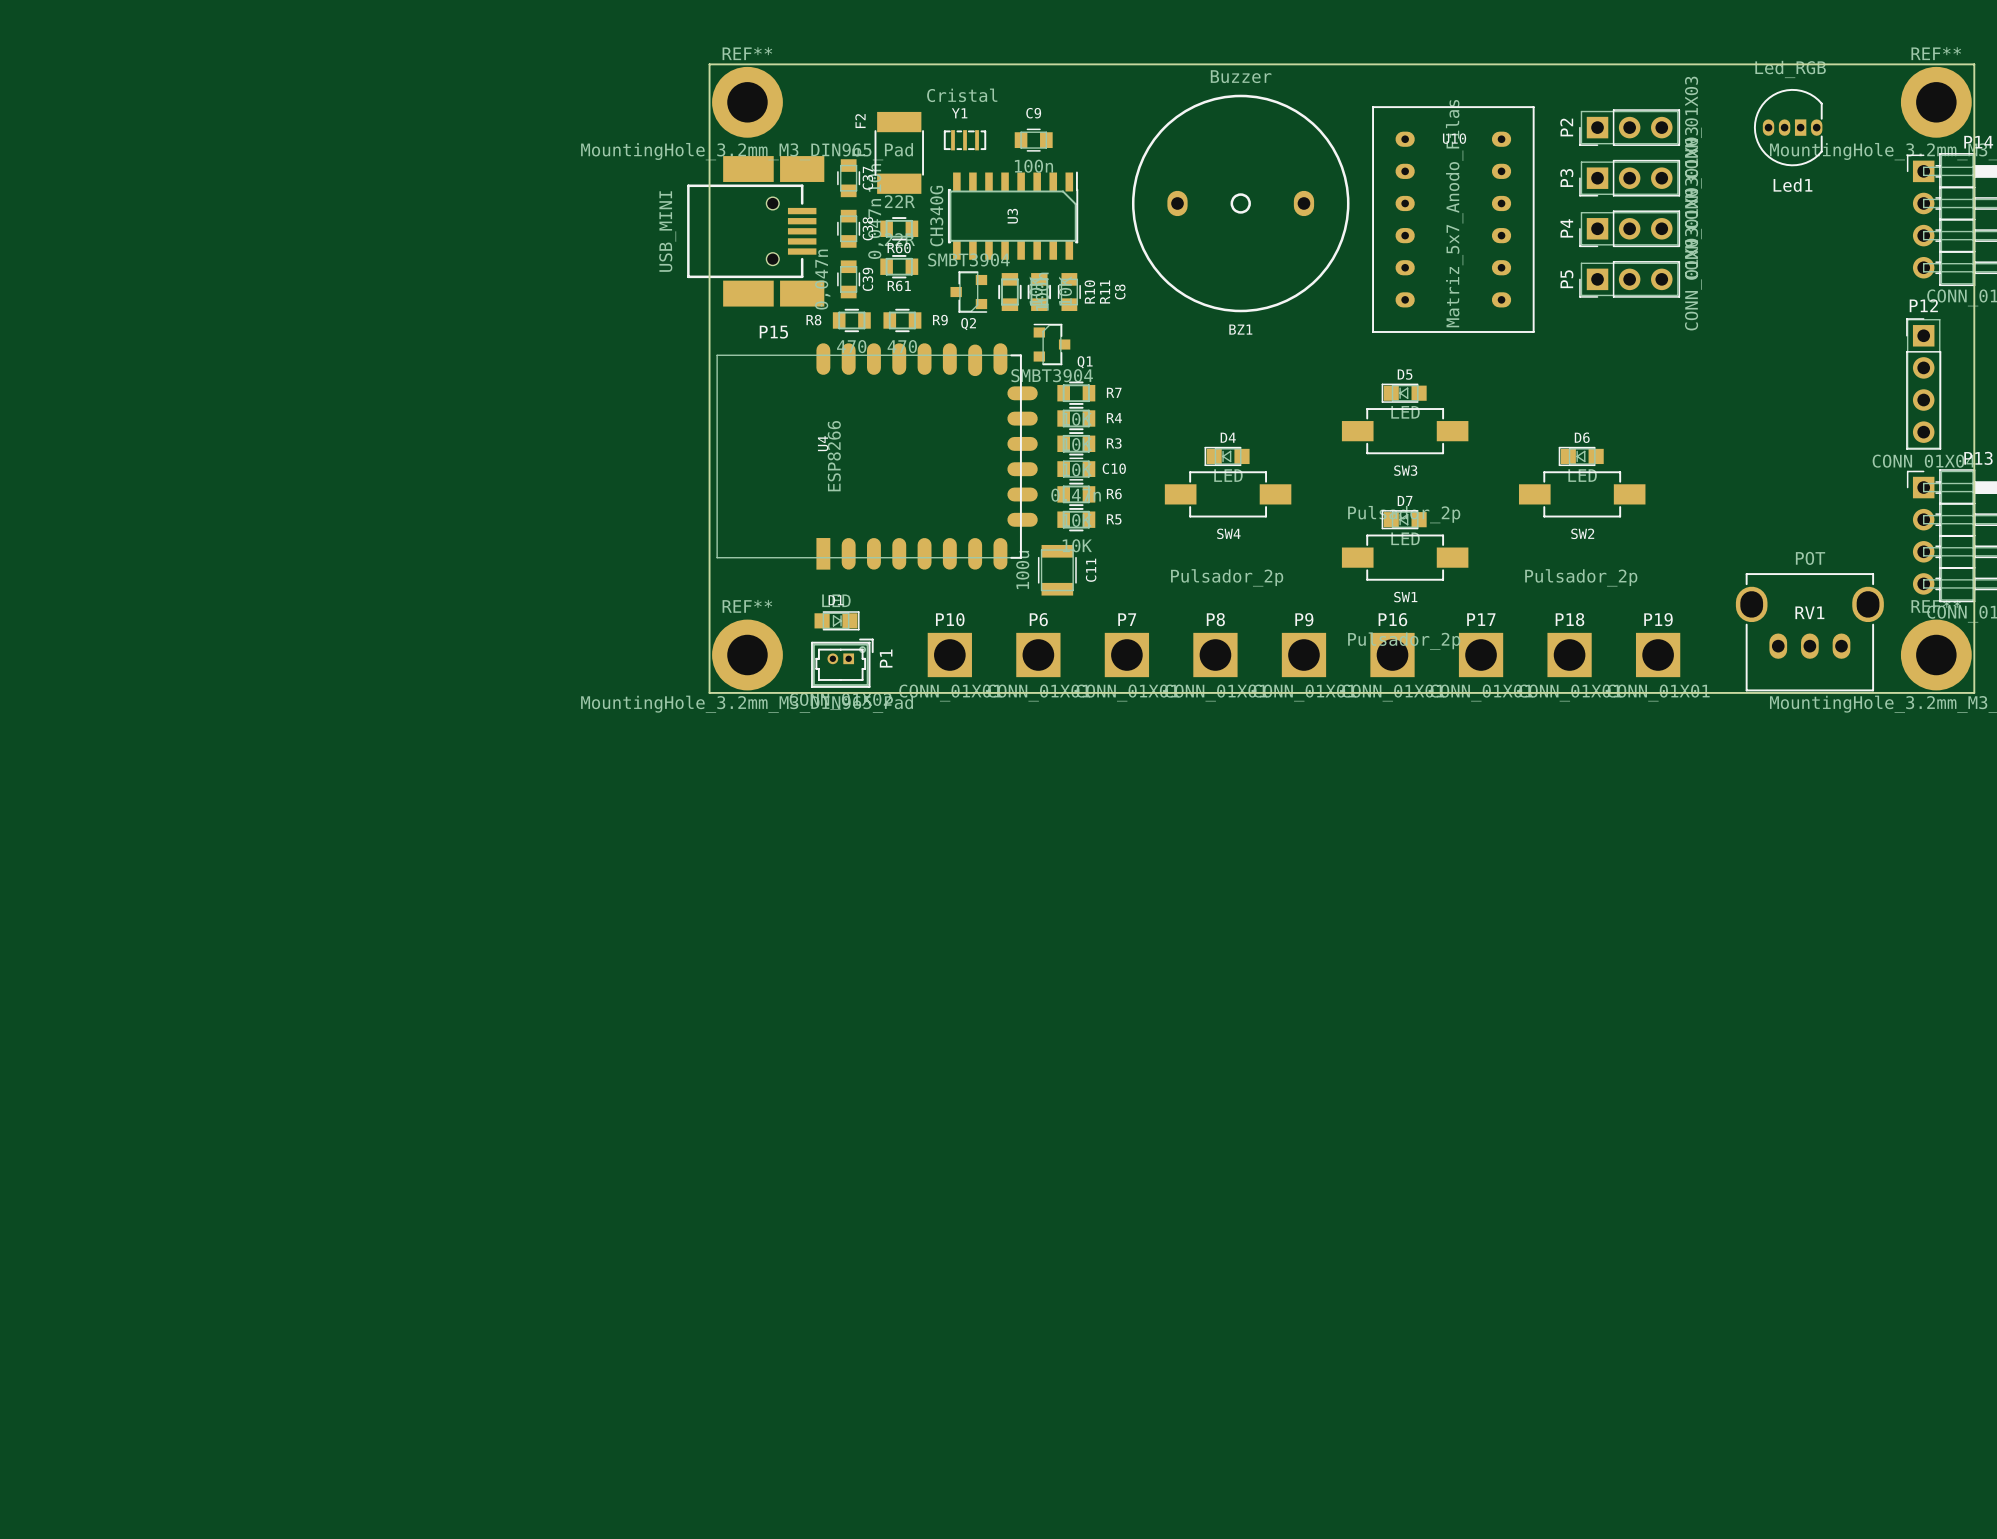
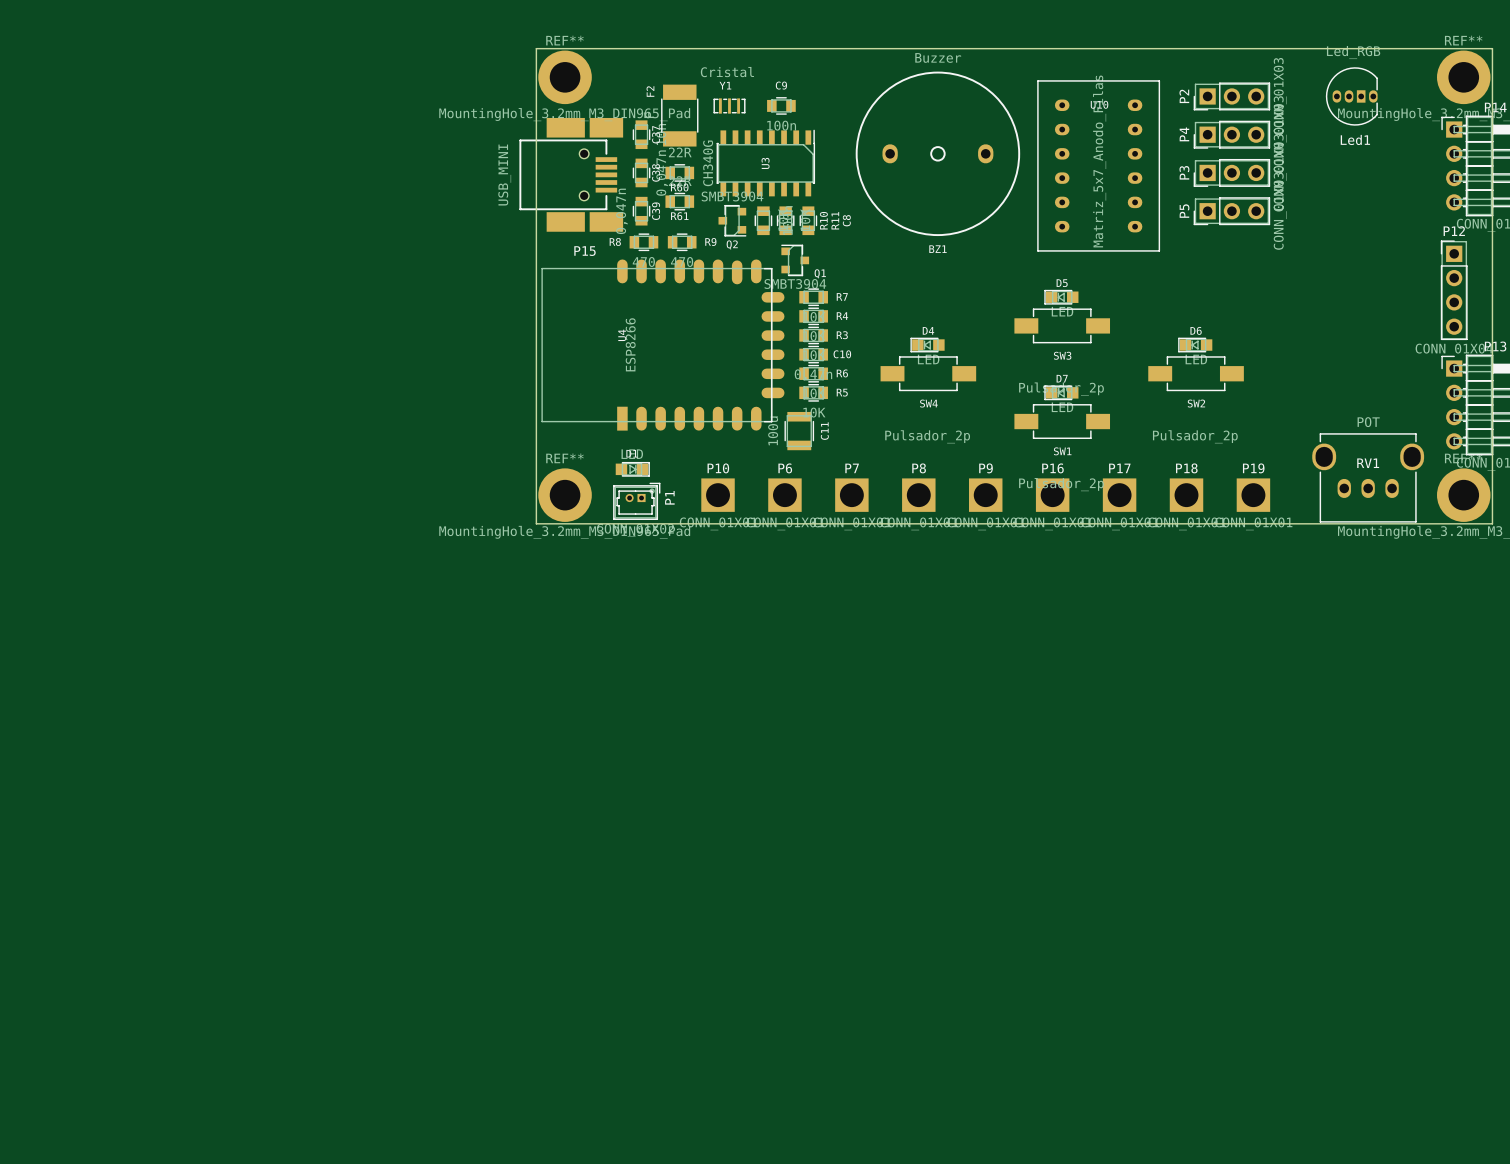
P3 name: P3 (1566, 178) -> P4 (1184, 134)
P4 name: P4 (1566, 228) -> P3 (1184, 172)

